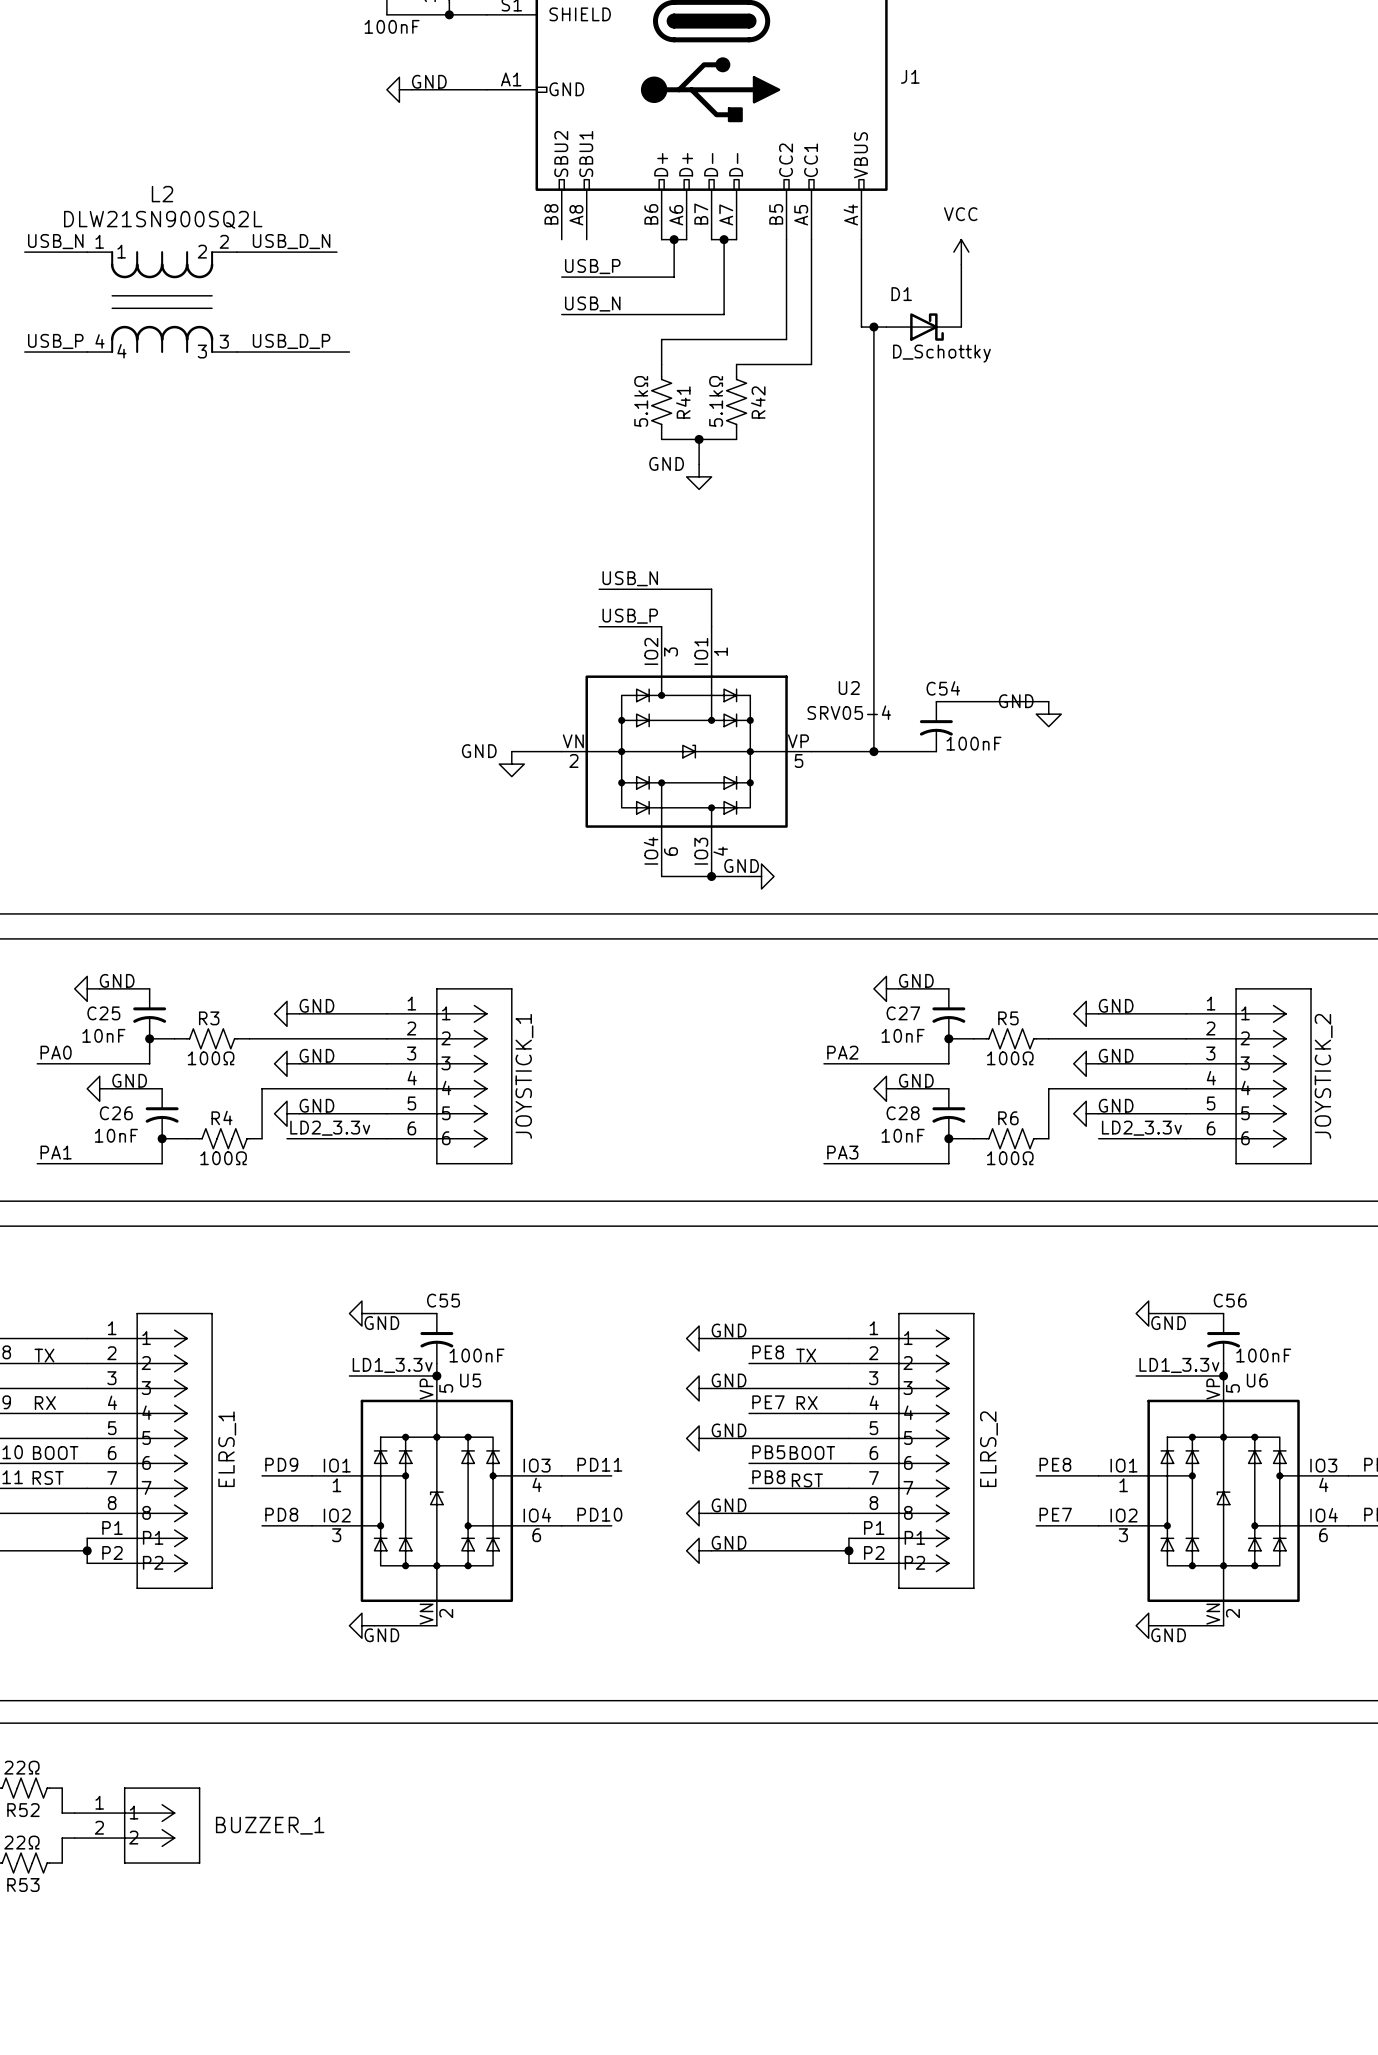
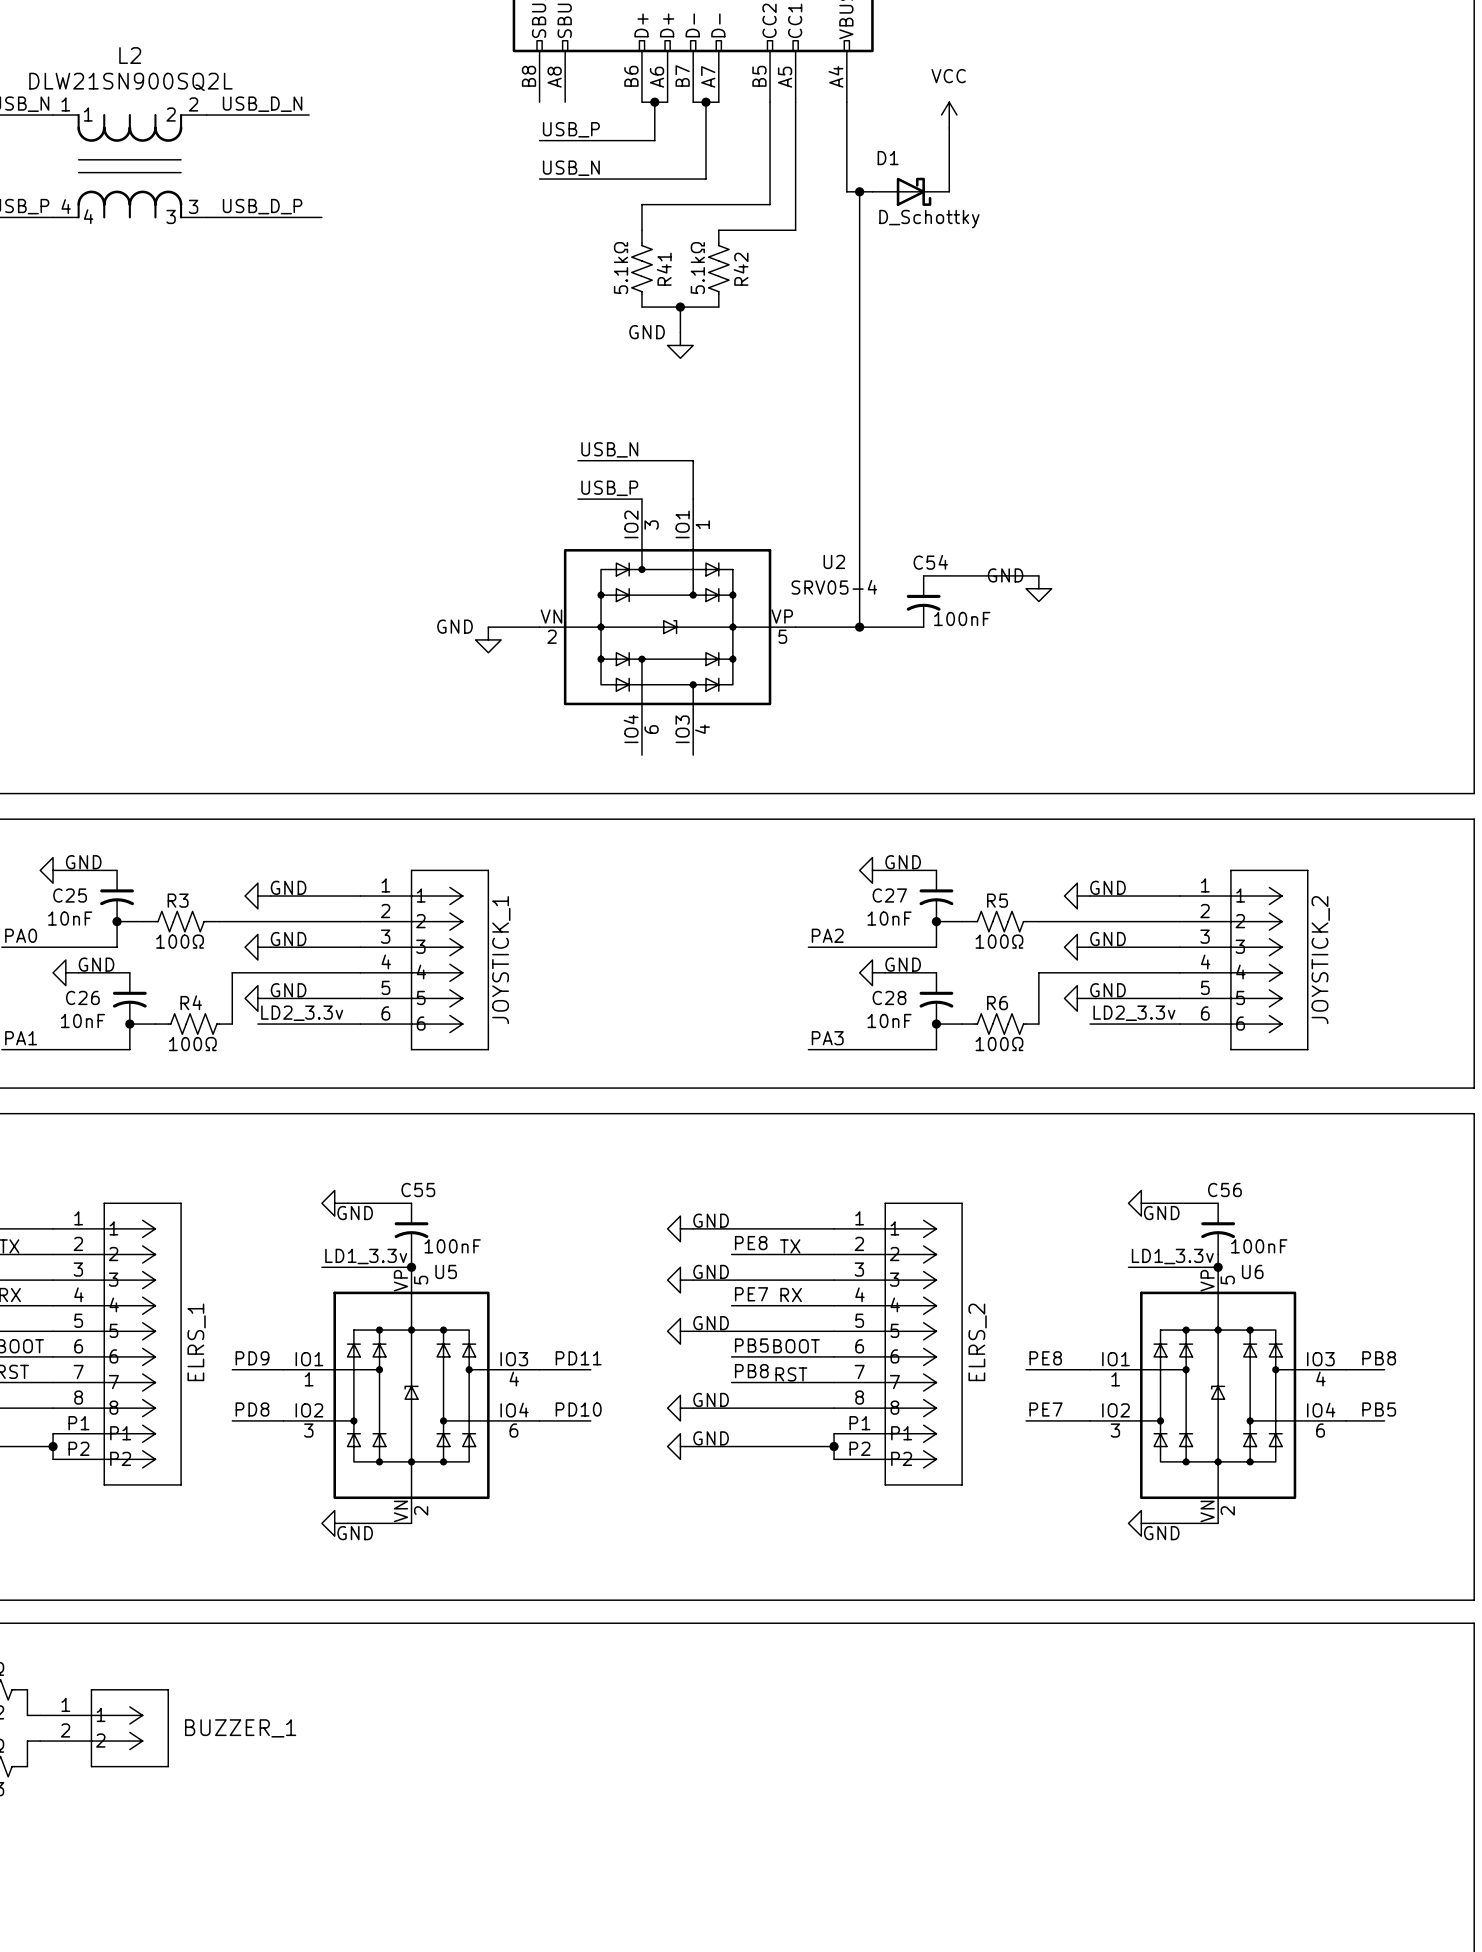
wire: (661, 876) (749, 876) -> none
junction: (711, 876) -> none
power symbol: GND (761, 876) -> none

